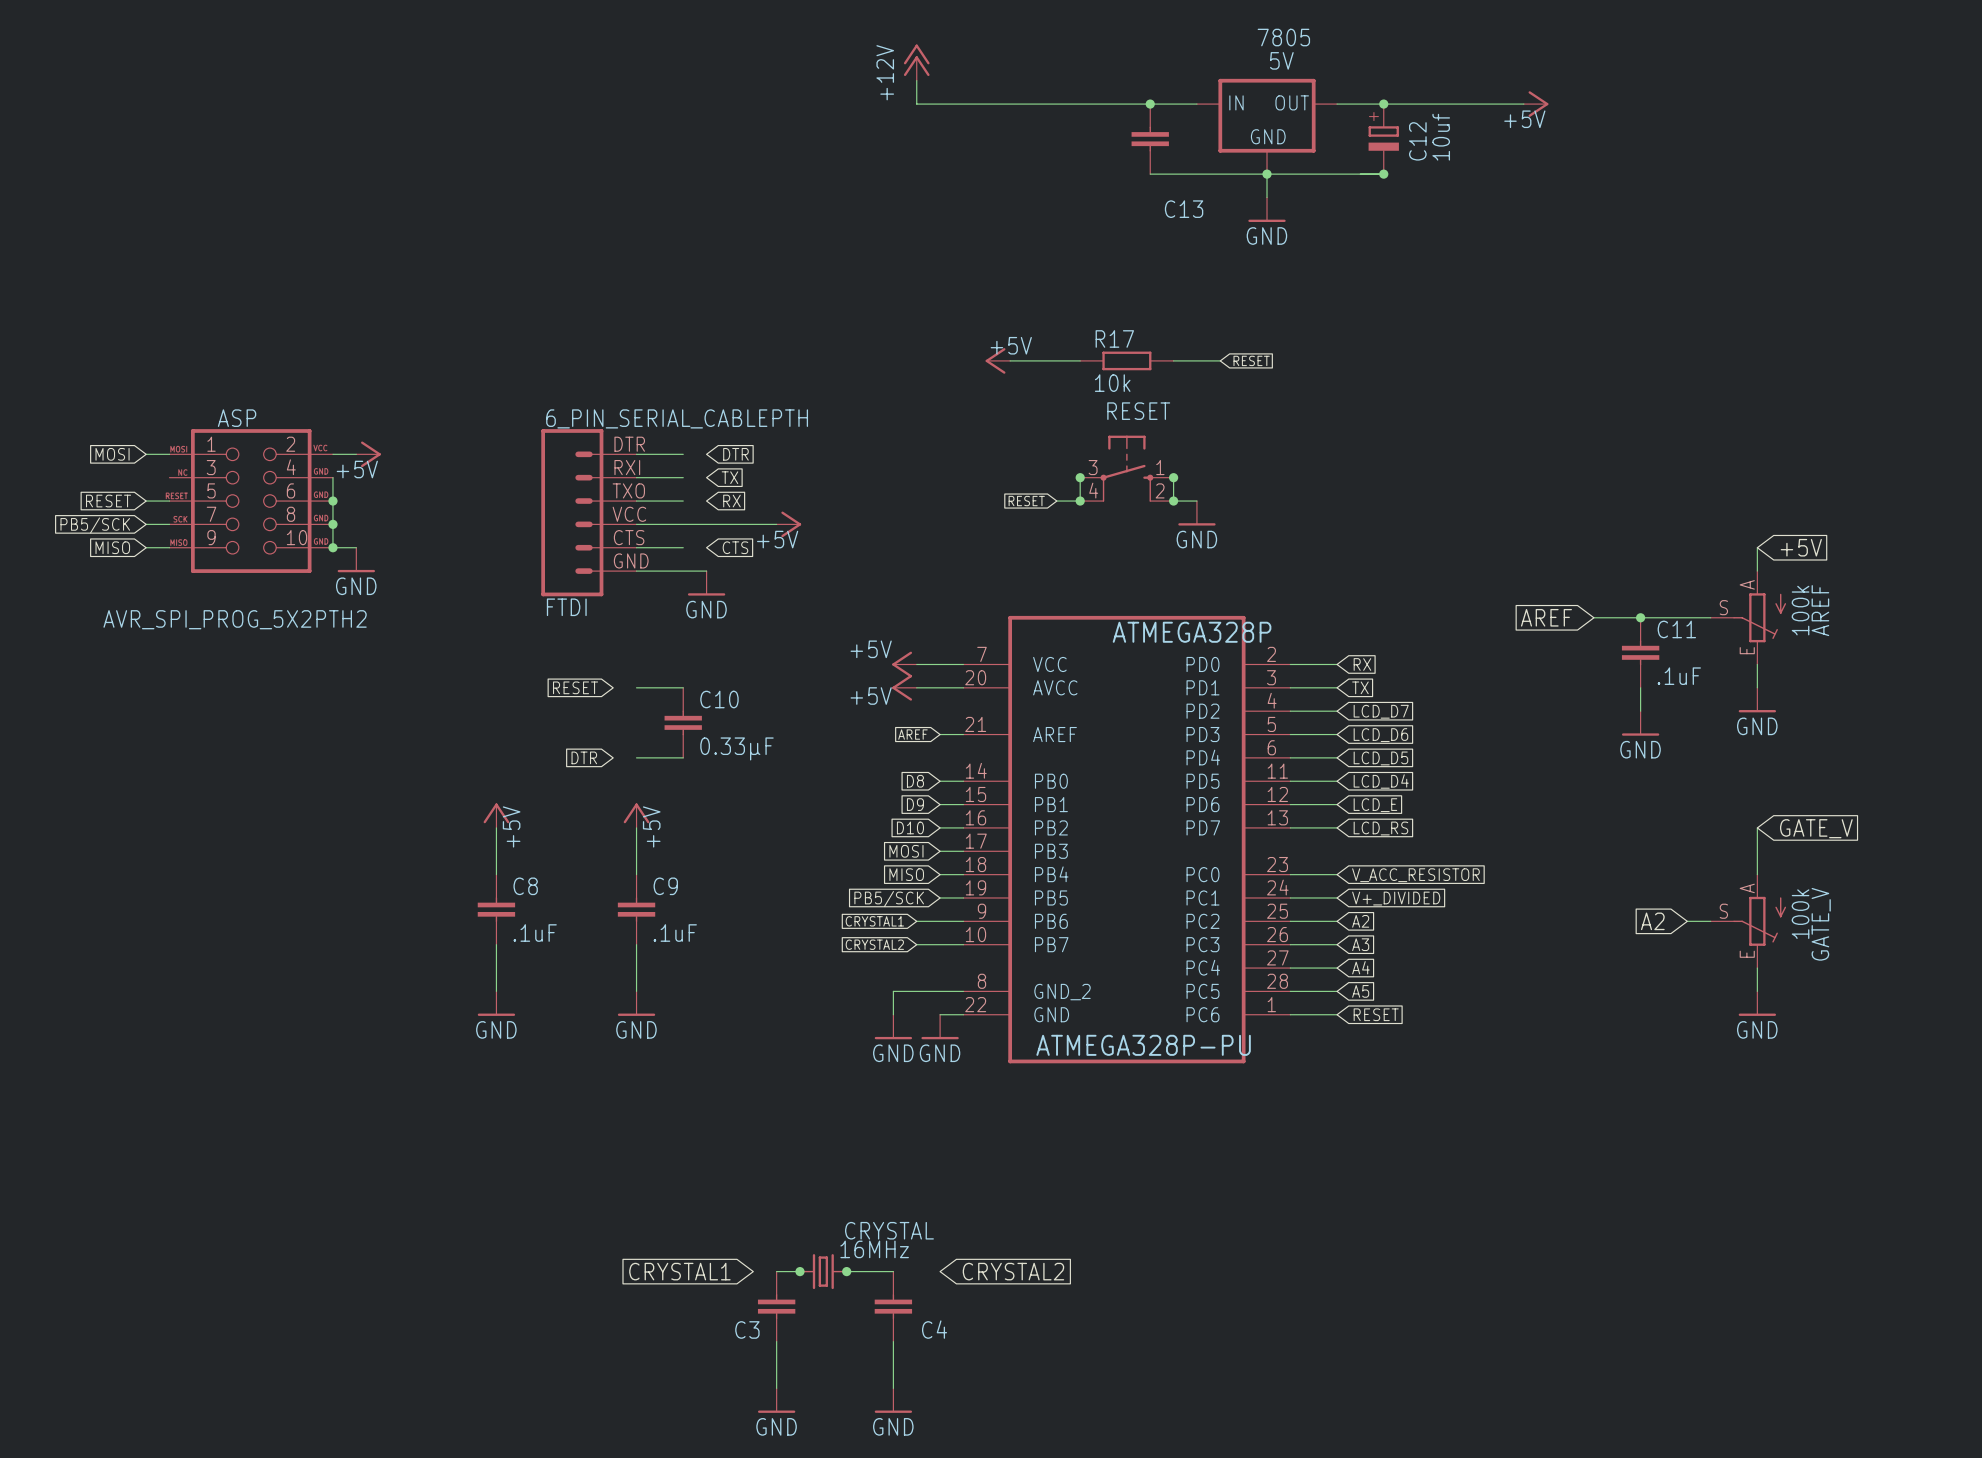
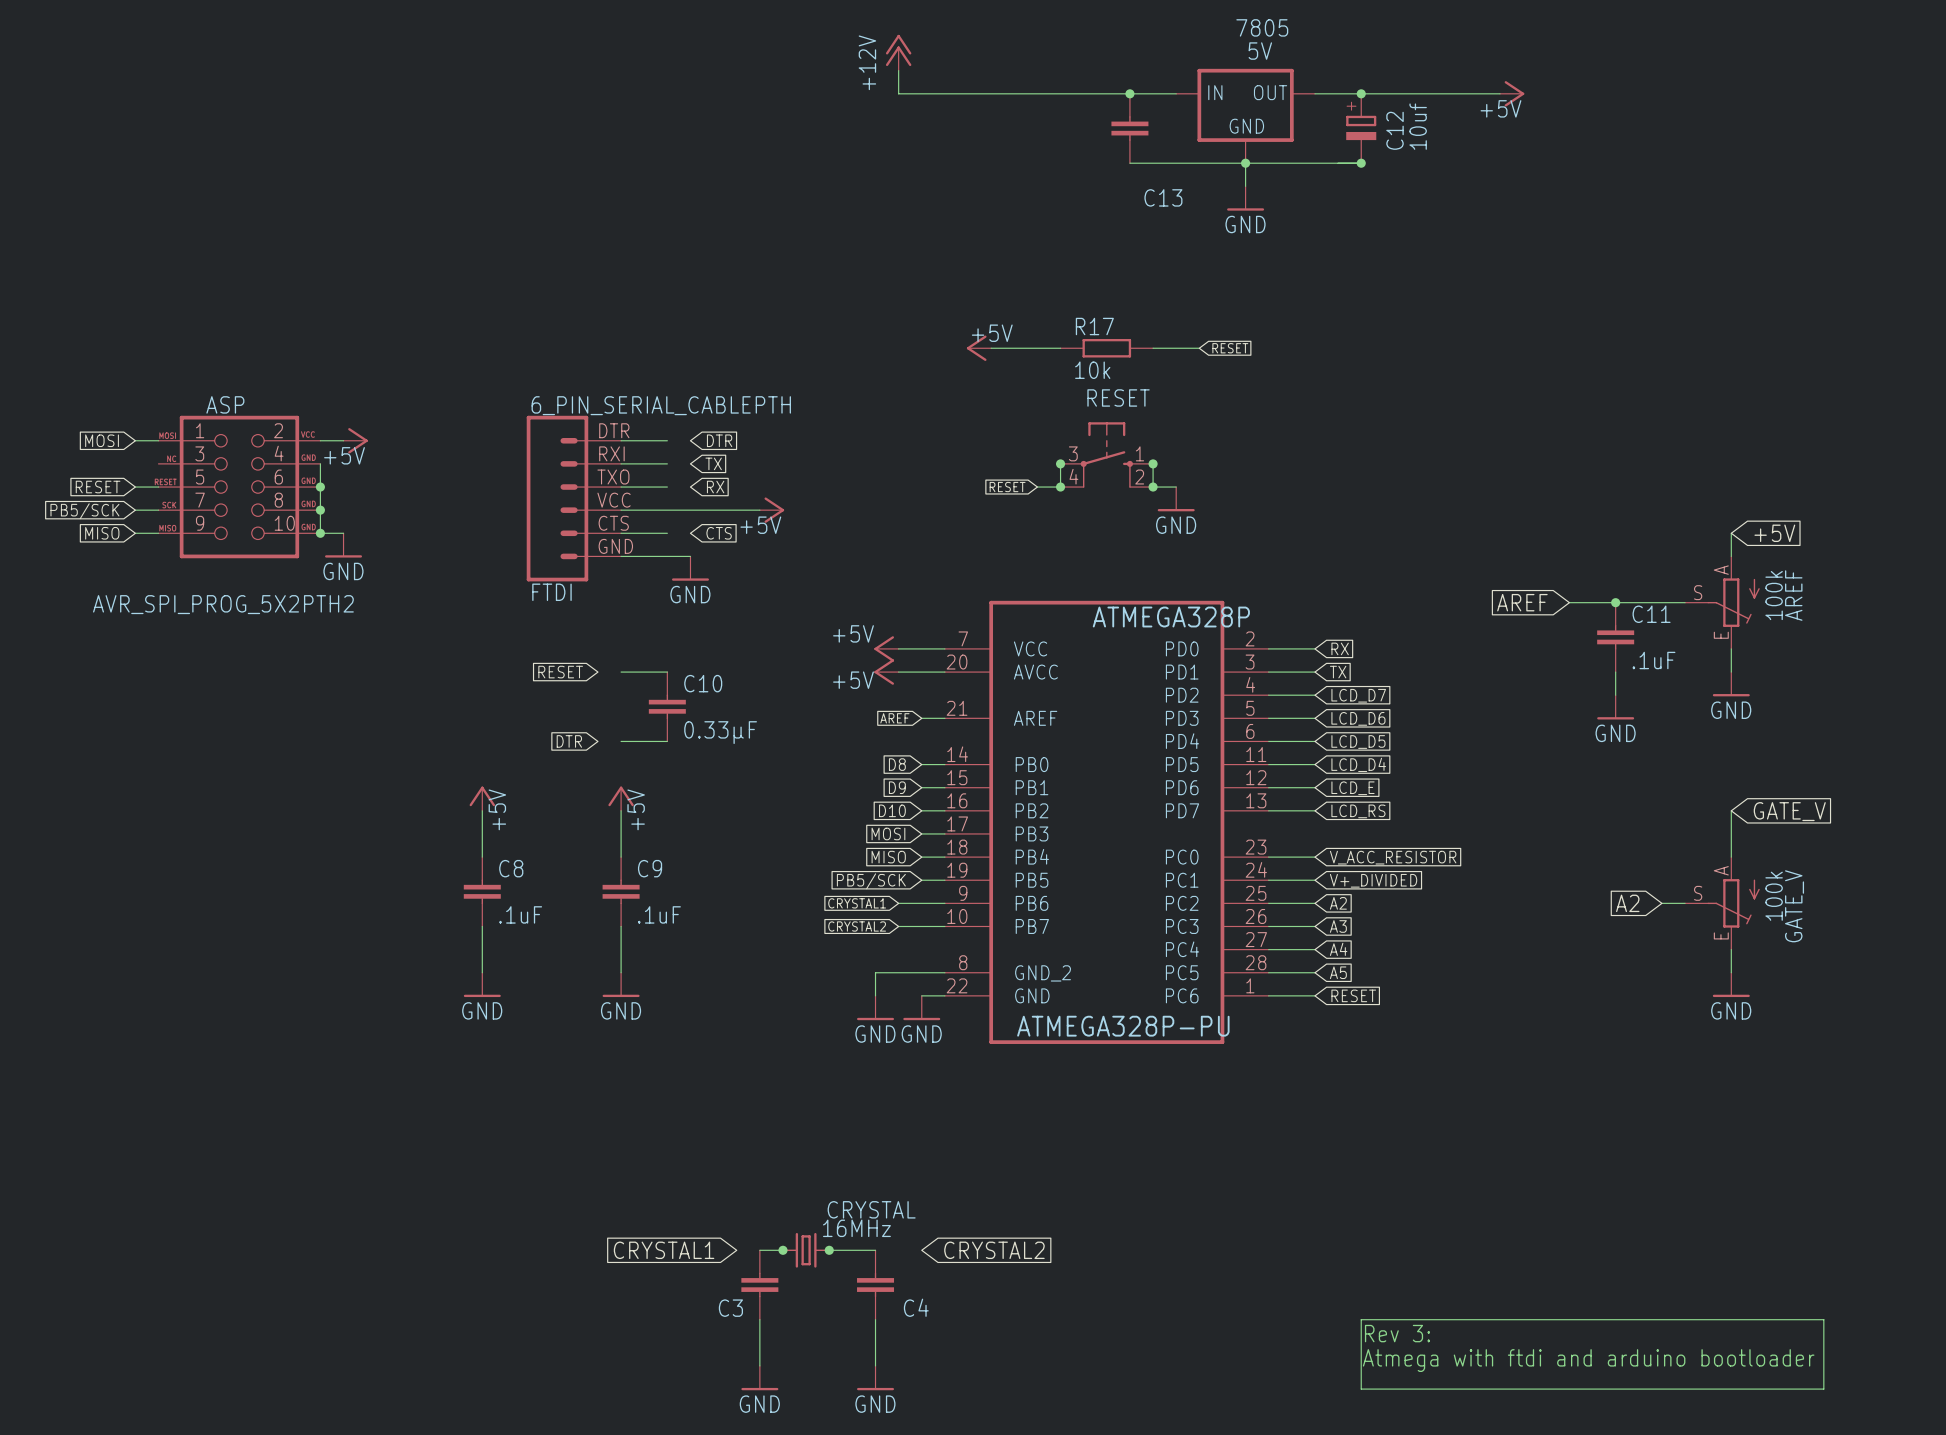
wire: none -> (1361, 1319) (1361, 1389) (1823, 1389) (1823, 1319) (1361, 1319)
text: none -> Rev 3: (1397, 1333)
text: none -> Atmega with ftdi and arduino bootloader (1588, 1360)

